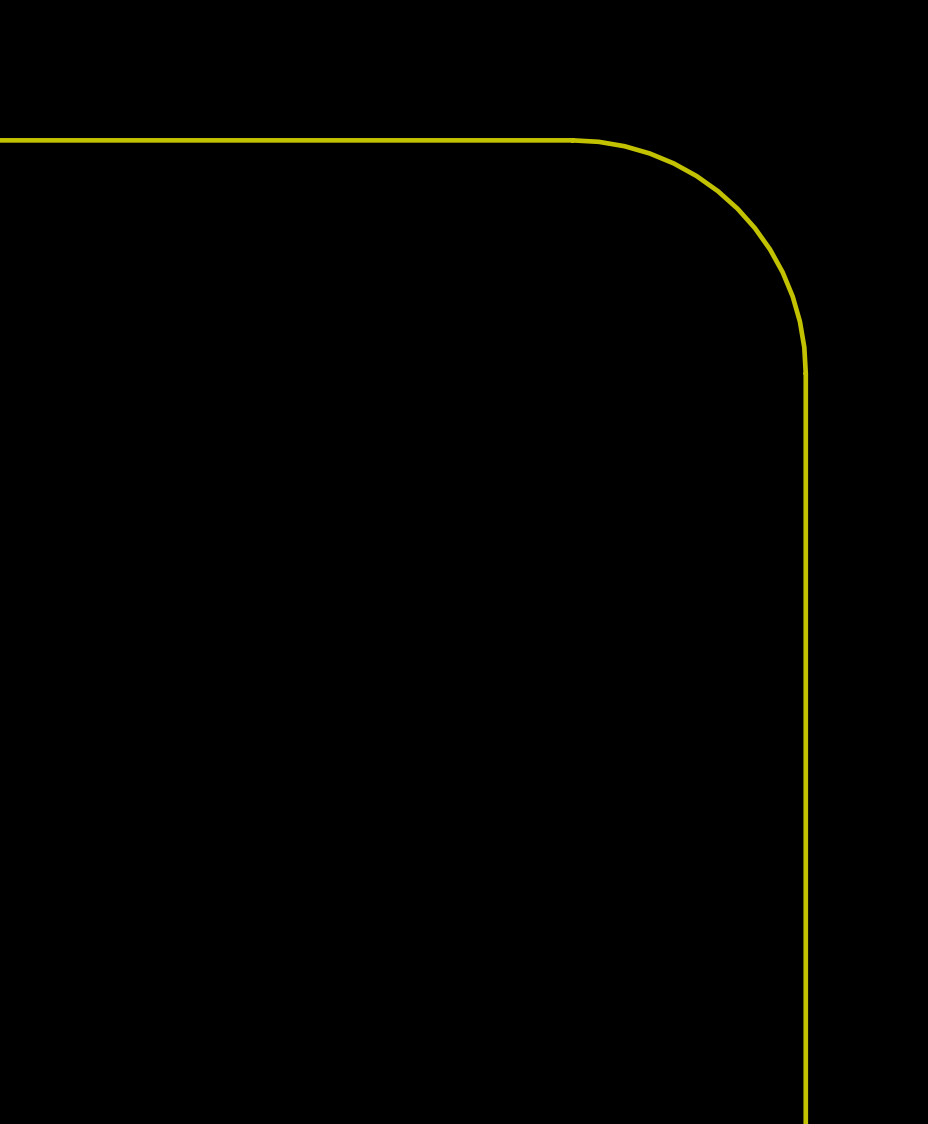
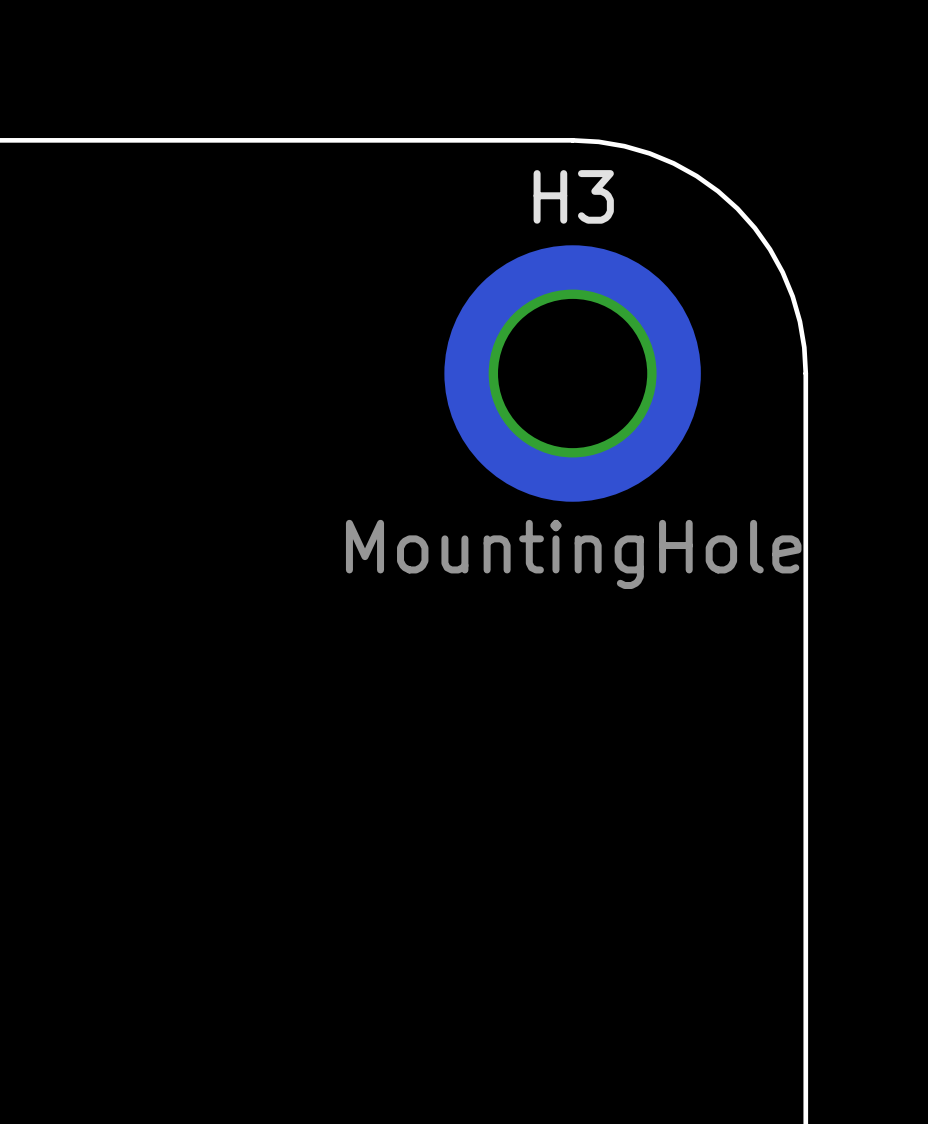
H3: none -> MountingHole (572, 373)

